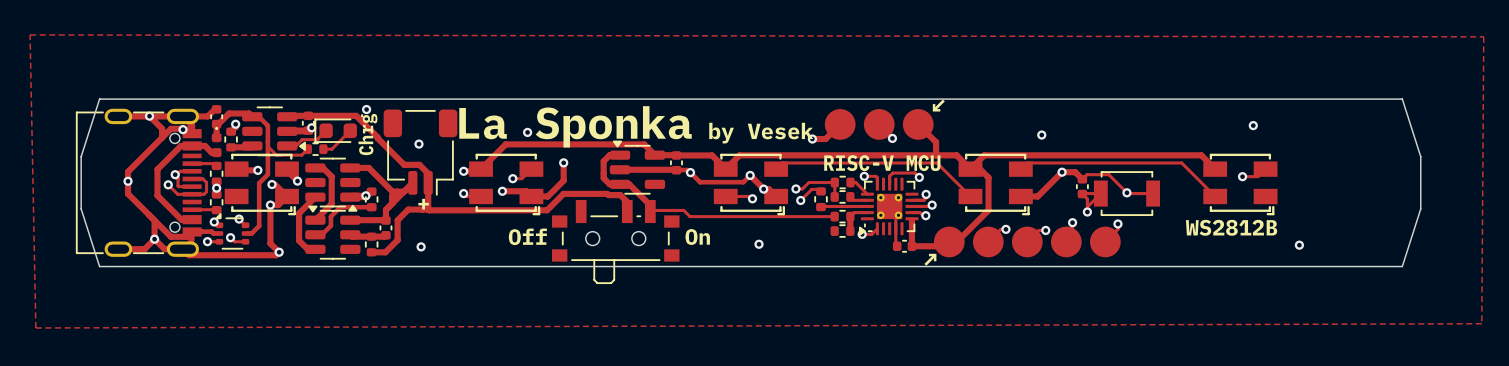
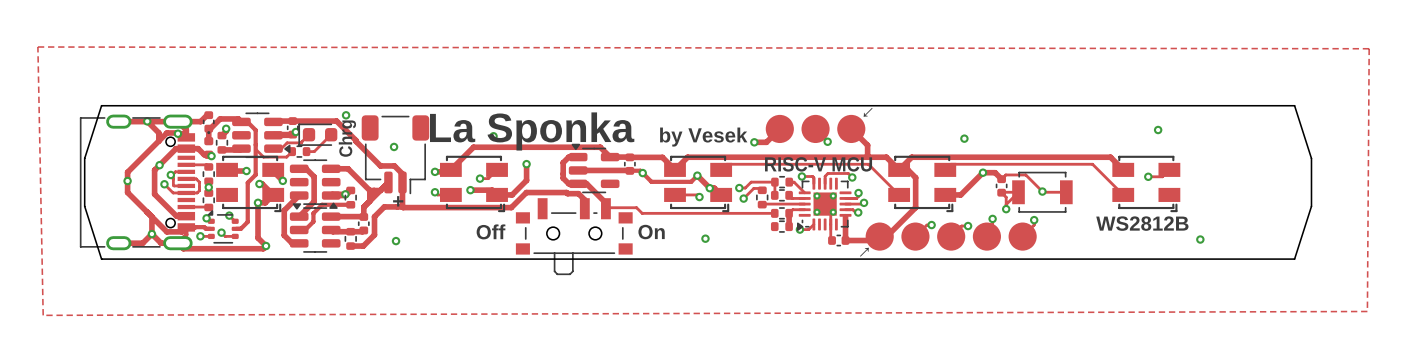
via: none -> (211, 156)
via: none -> (159, 165)

